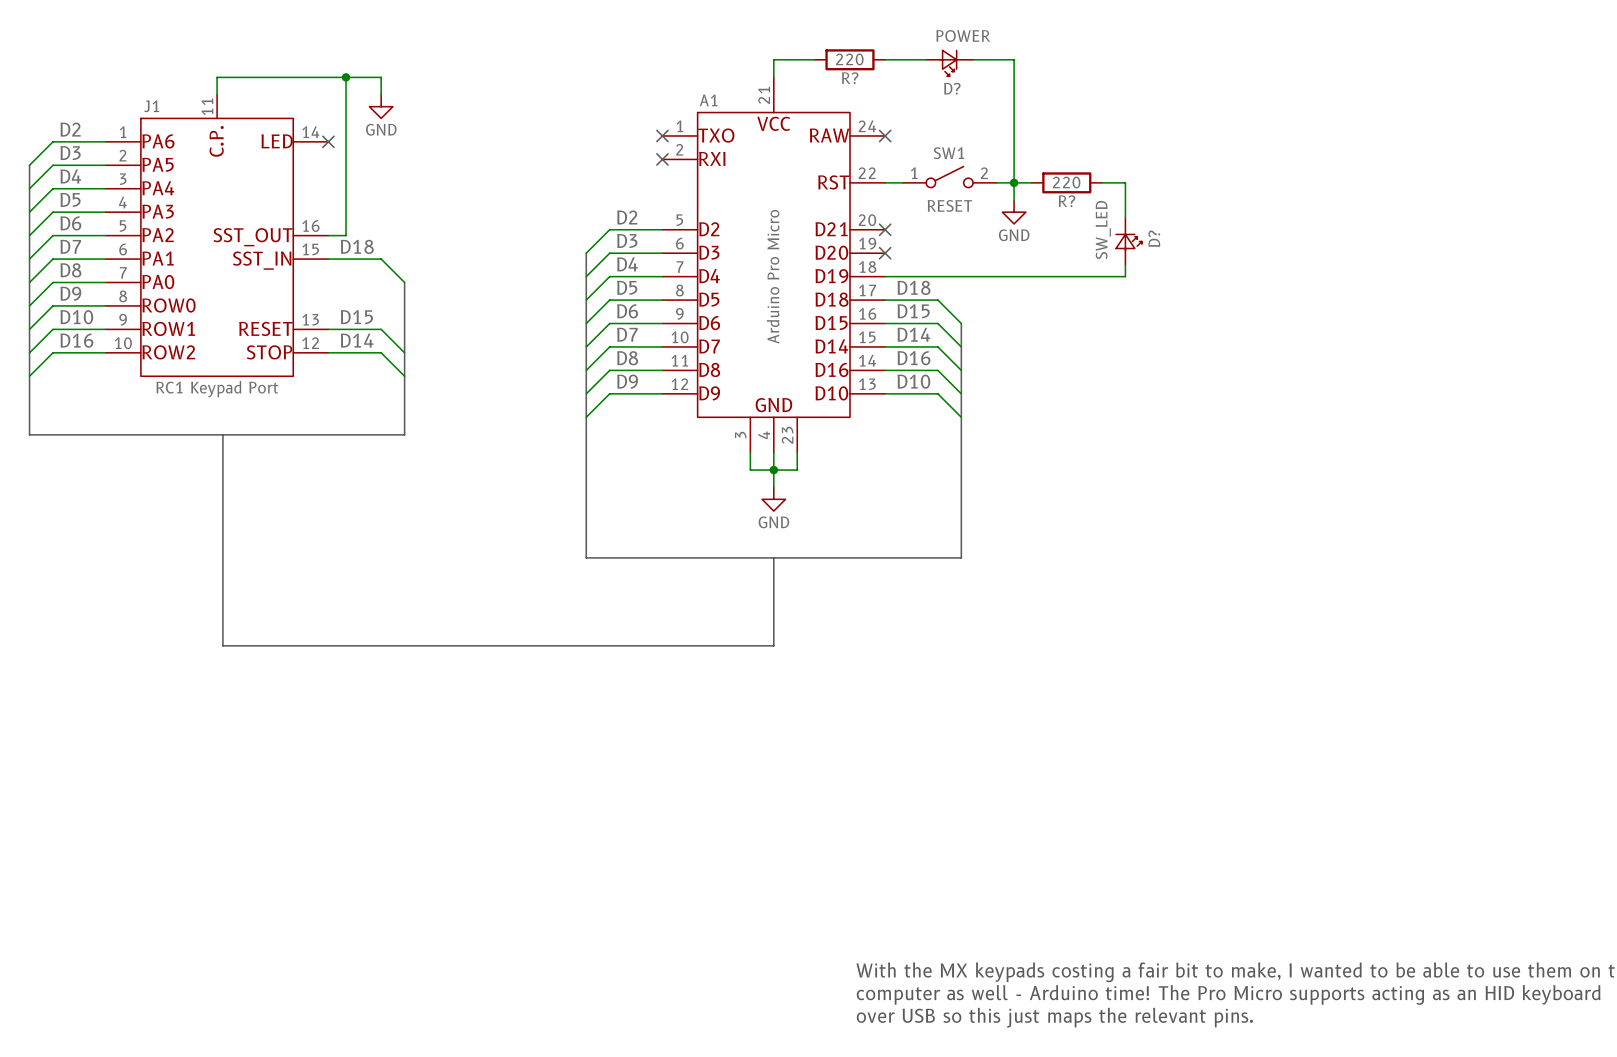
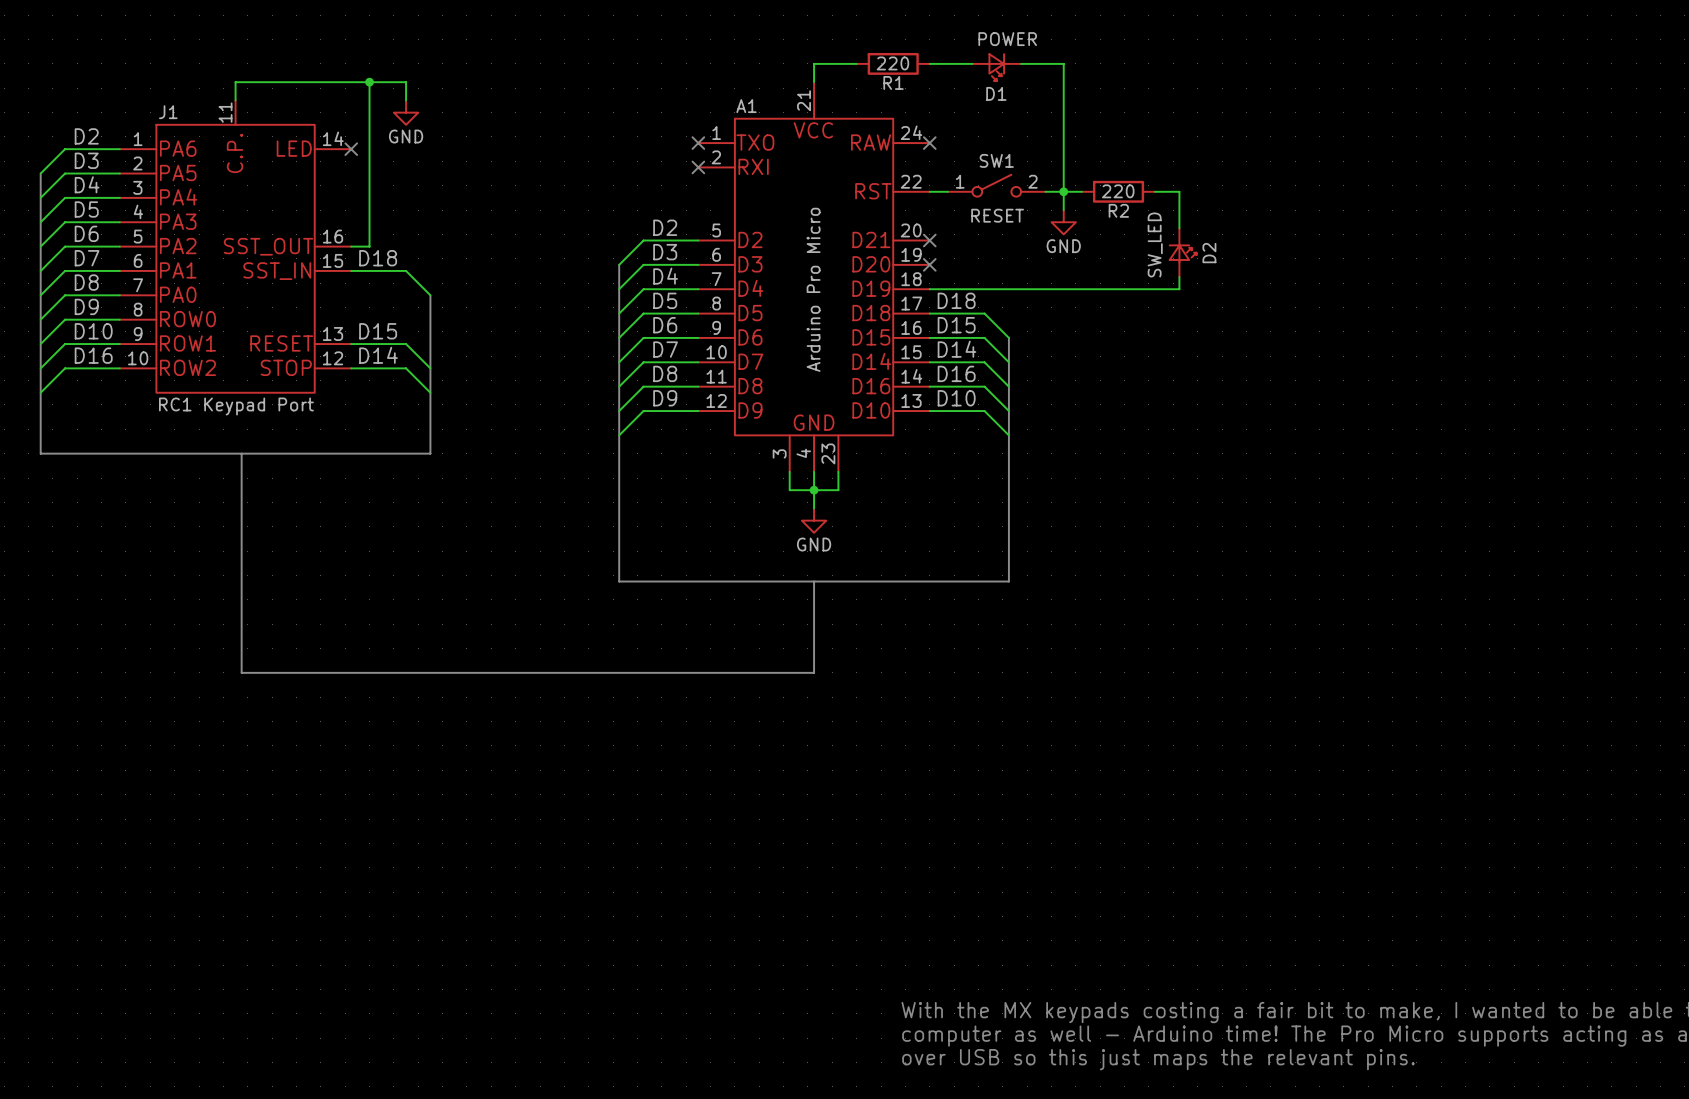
R? name: R? (850, 78) -> R1 (893, 82)
D? name: D? (952, 88) -> D1 (996, 93)
R? name: R? (1067, 201) -> R2 (1118, 210)
D? name: D? (1154, 238) -> D2 (1209, 253)

